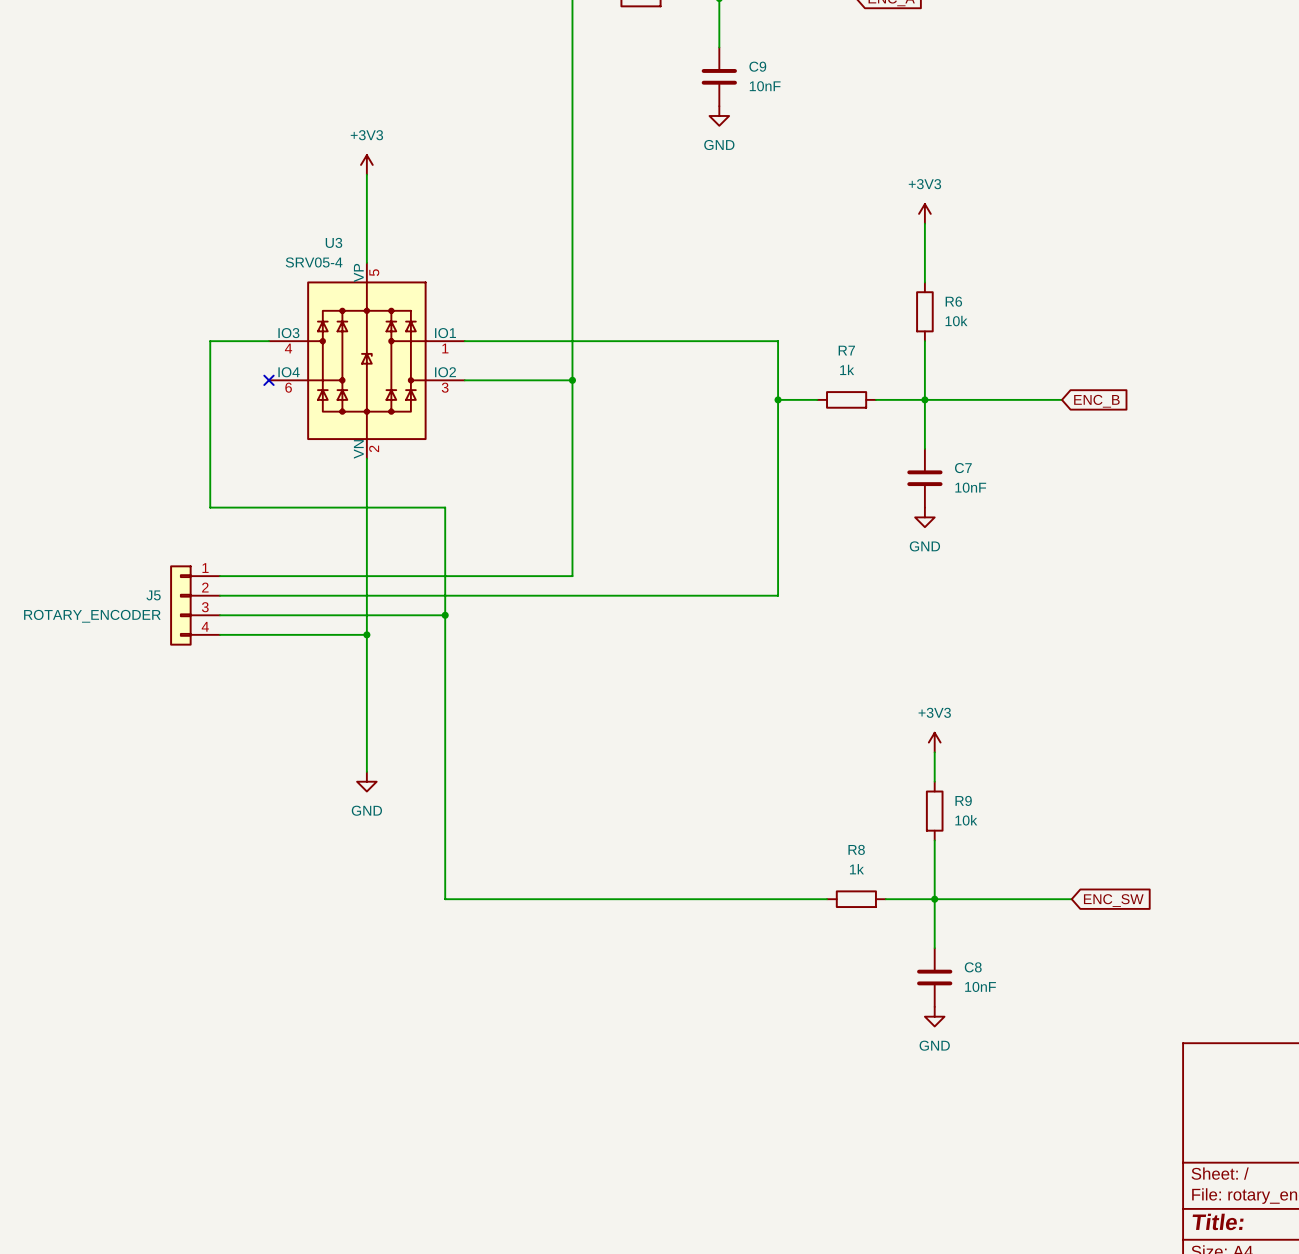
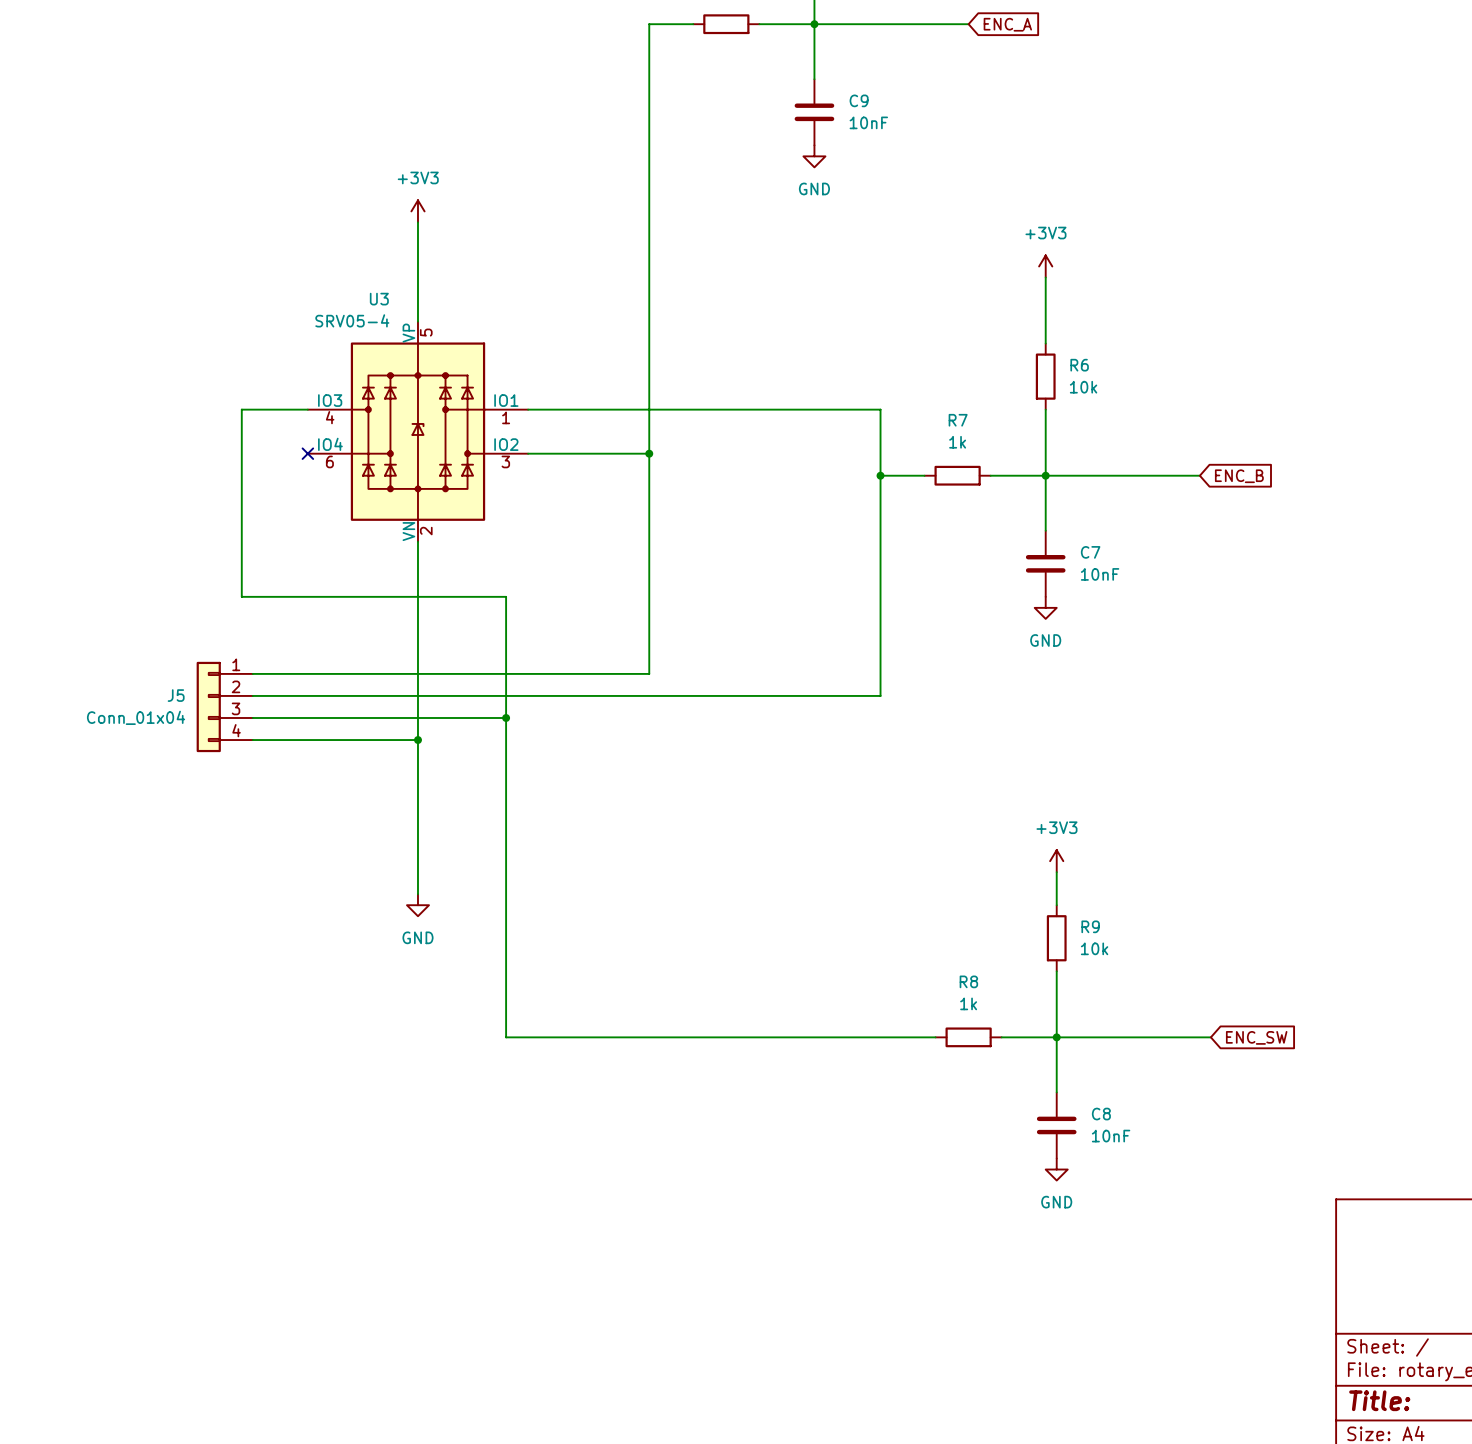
J5 value: ROTARY_ENCODER (92, 616) -> Conn_01x04 (136, 717)

